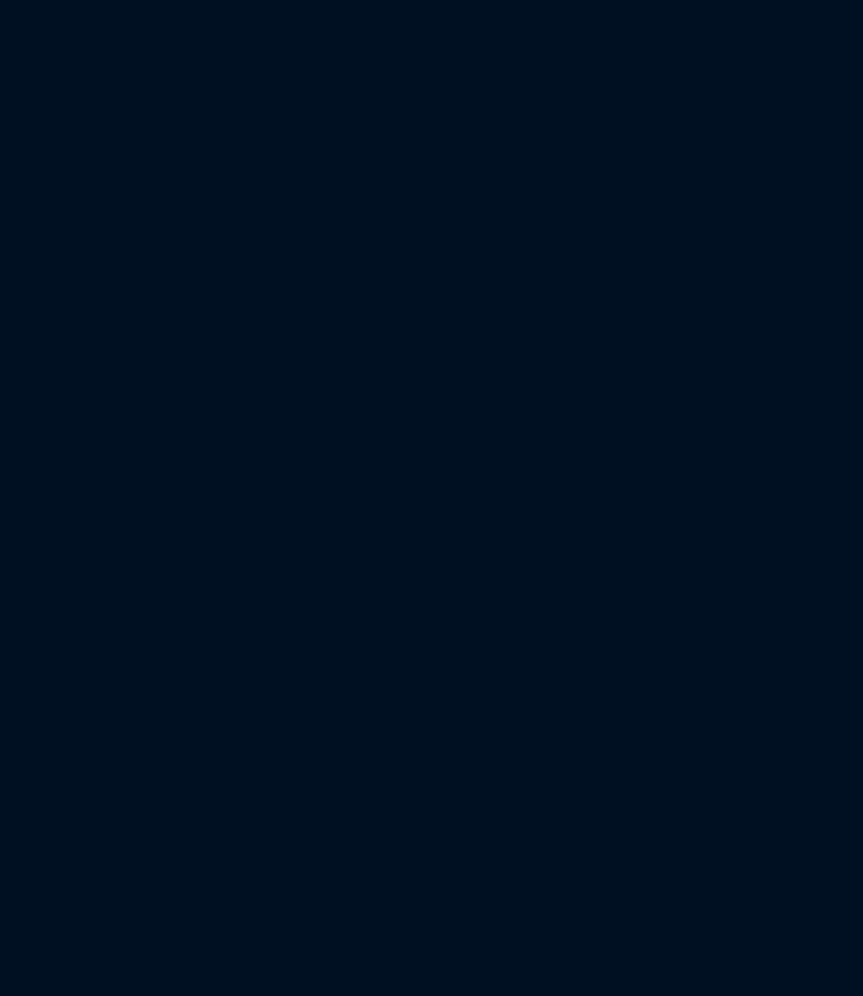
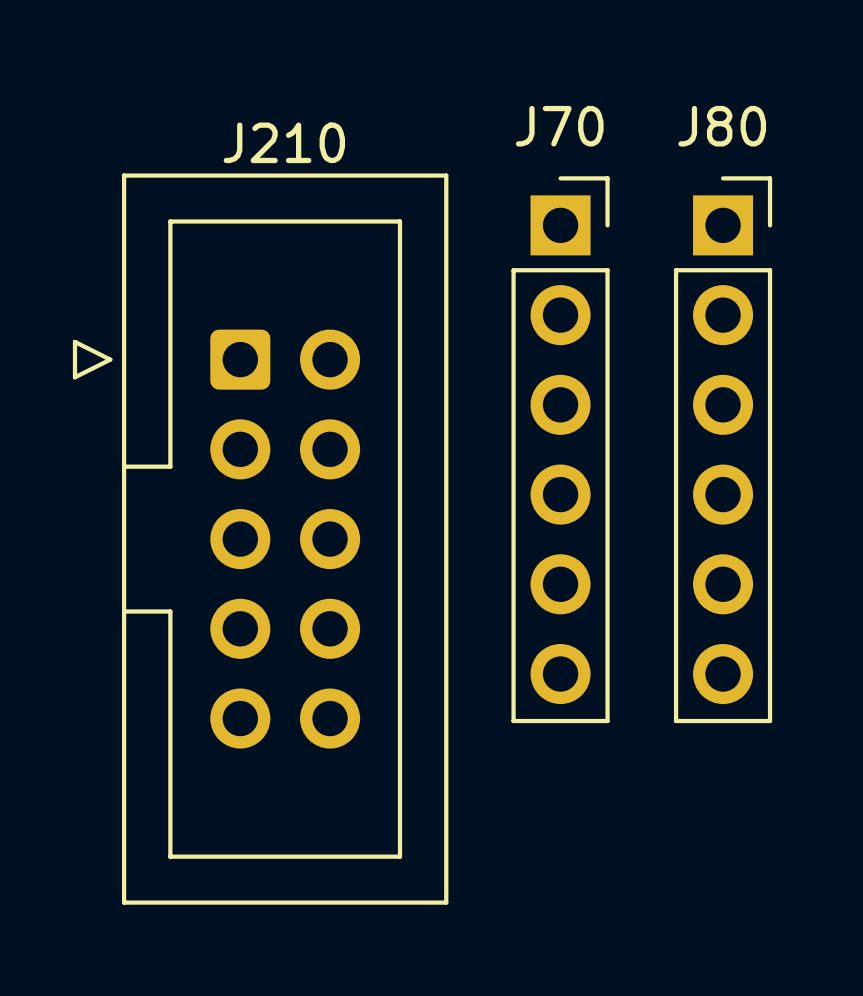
J70: none -> (560, 449)
J80: none -> (723, 449)
J210: none -> (260, 539)

